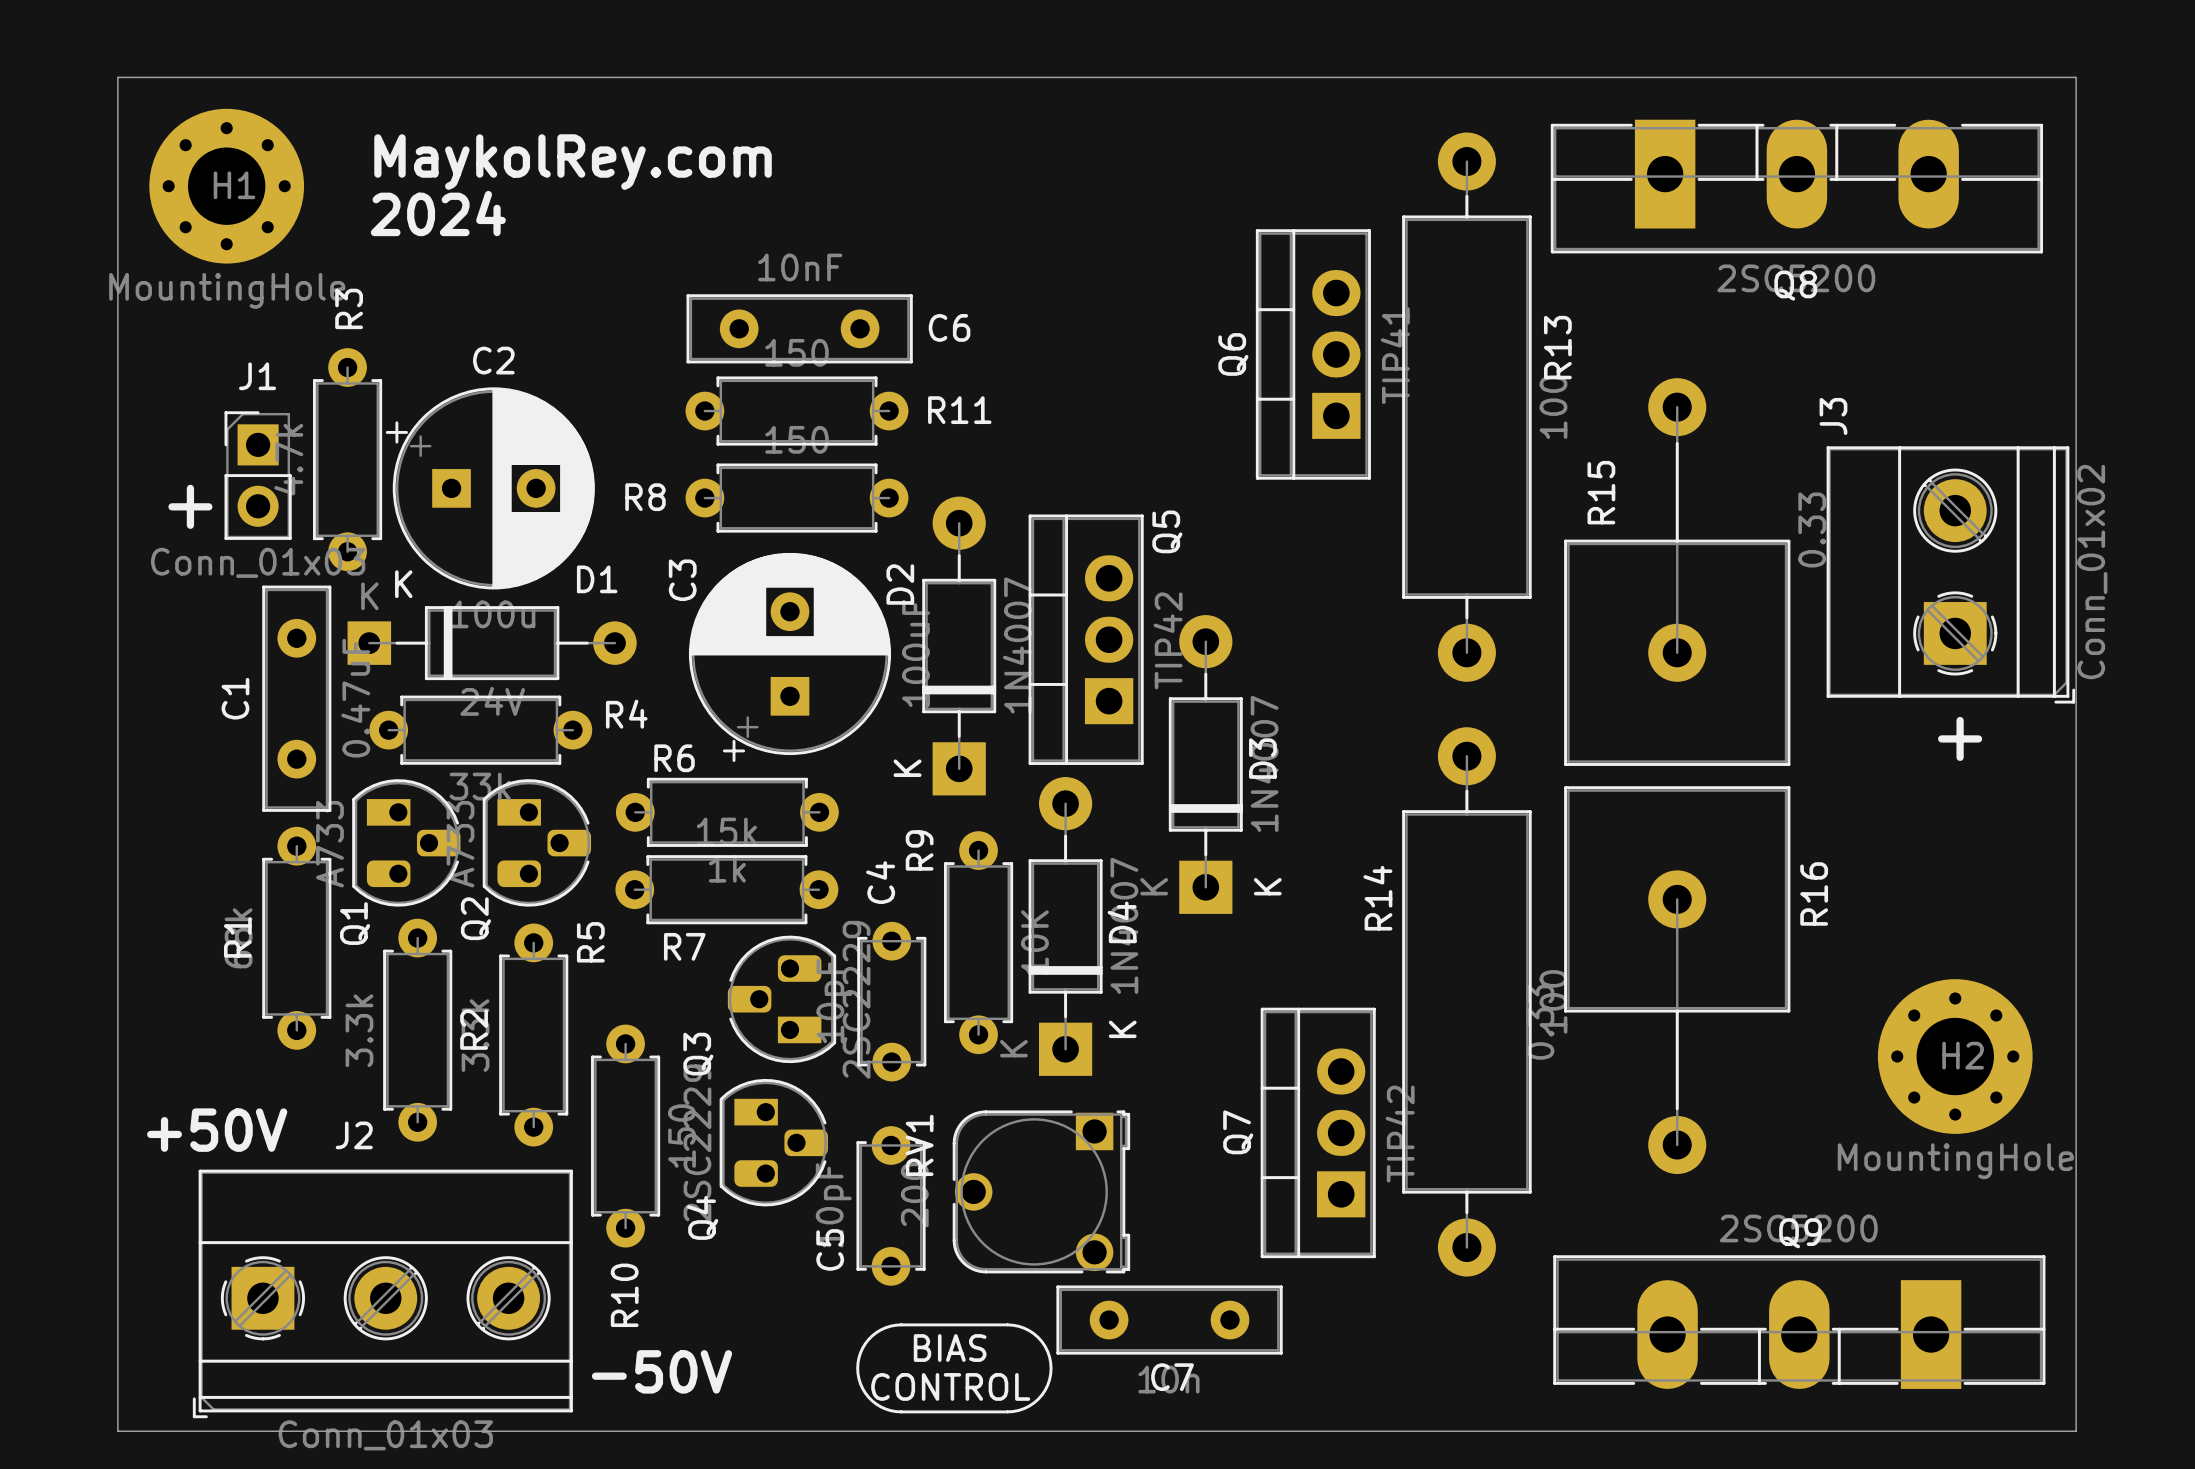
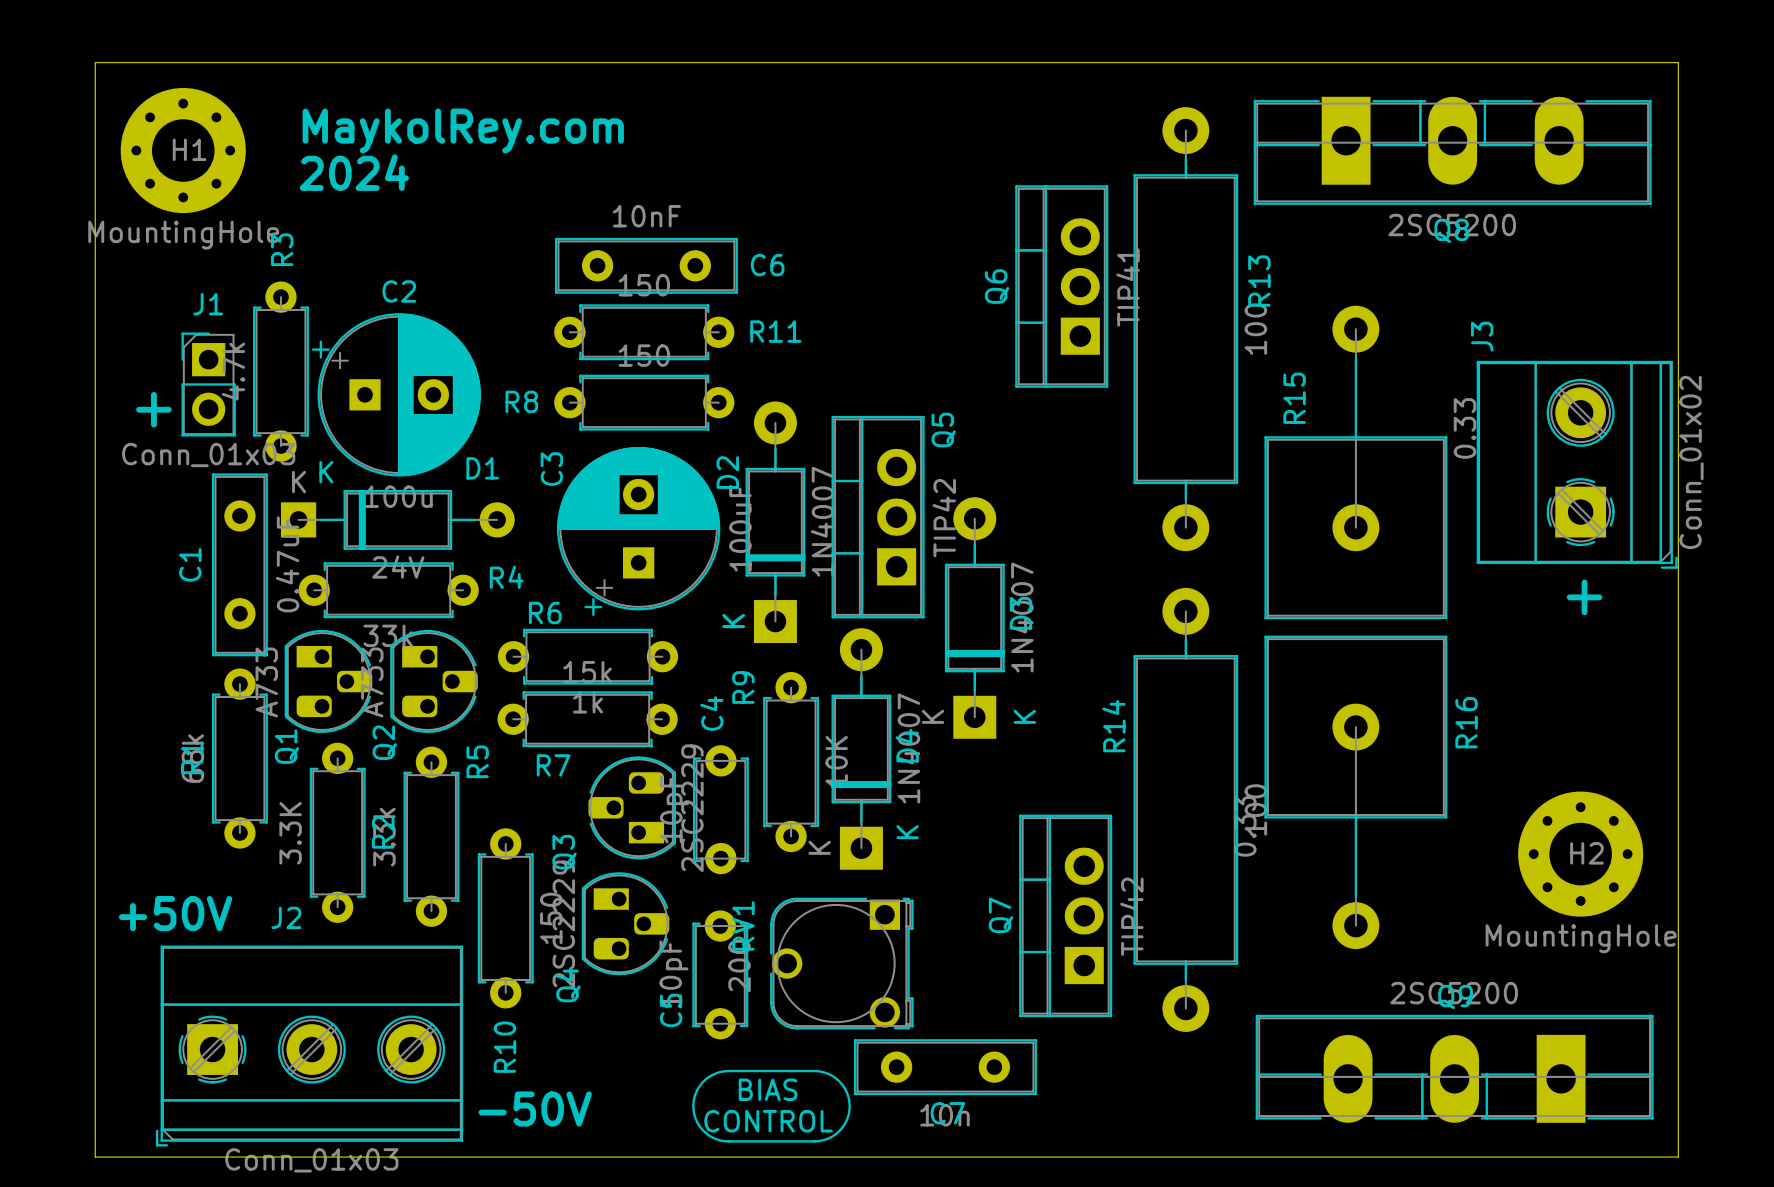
R2 value: 3.3k (359, 1030) -> 3.3K (290, 833)

